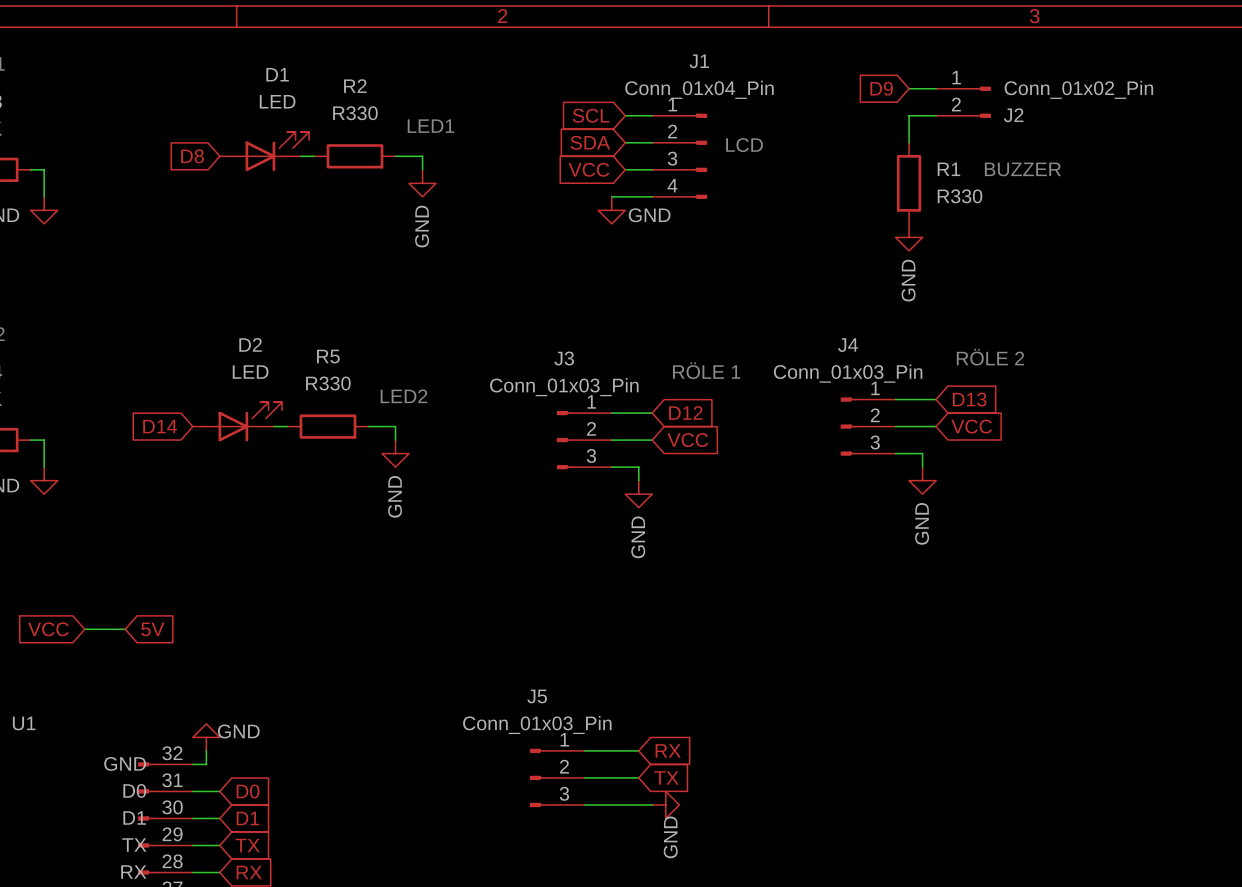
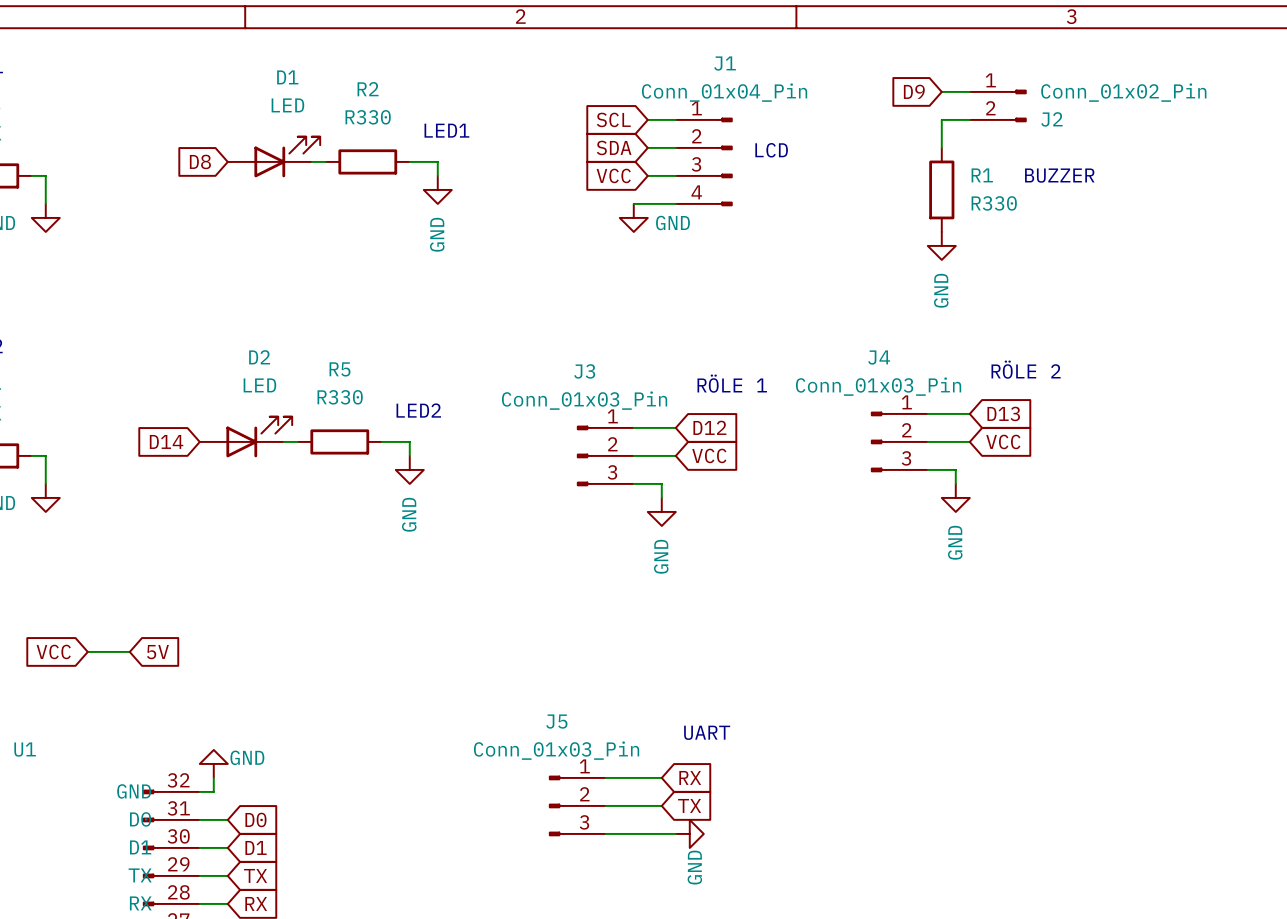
text: none -> UART (707, 732)

